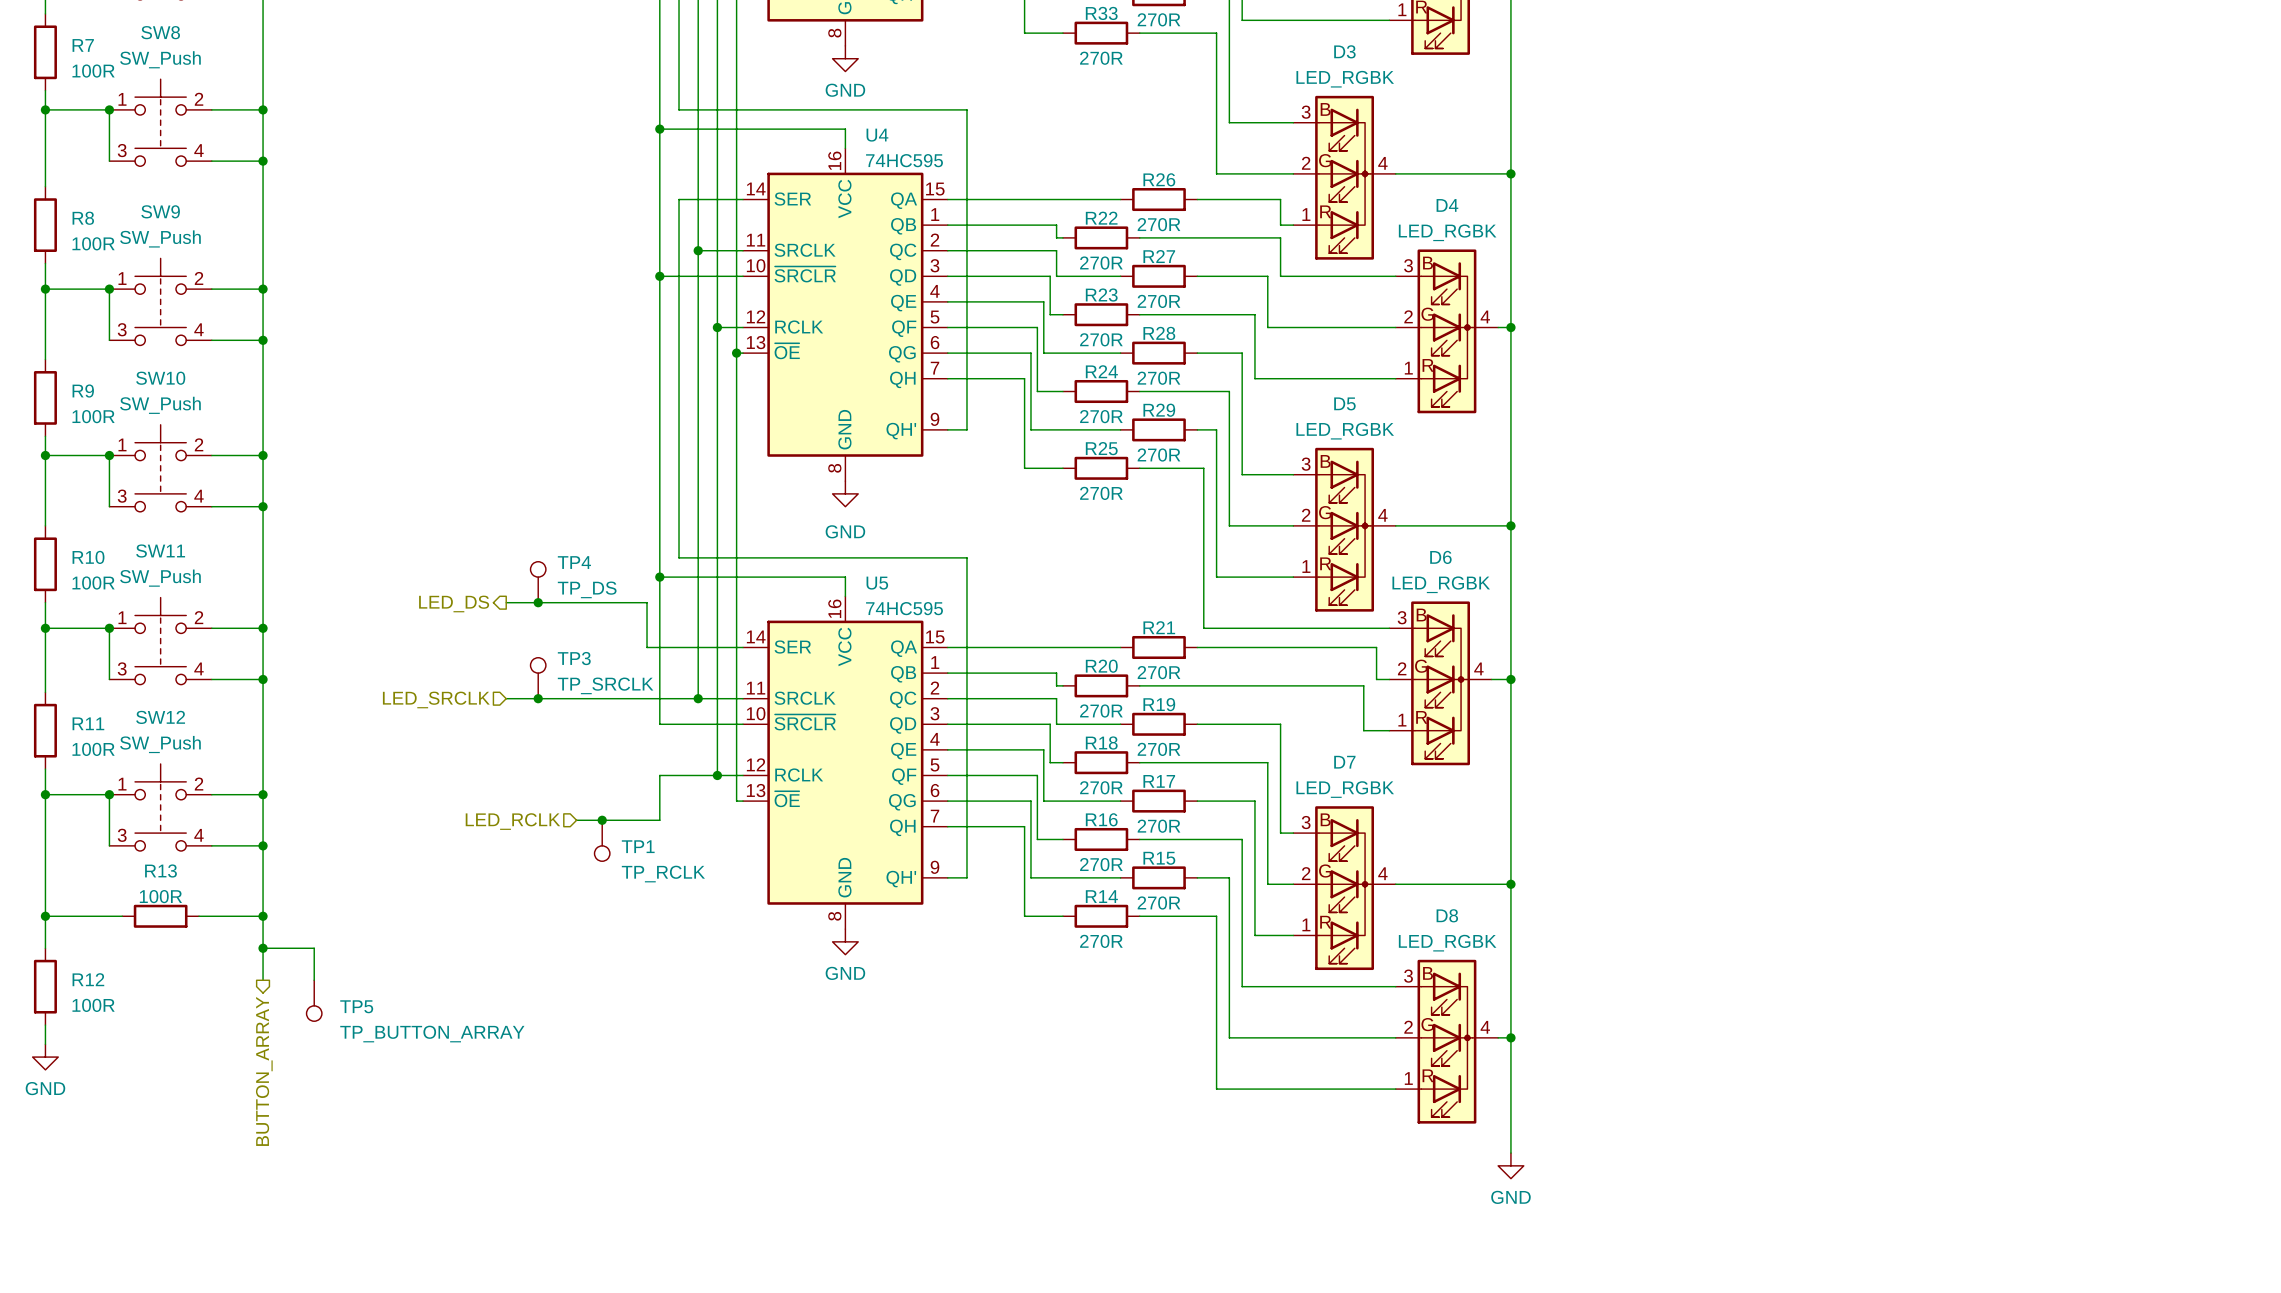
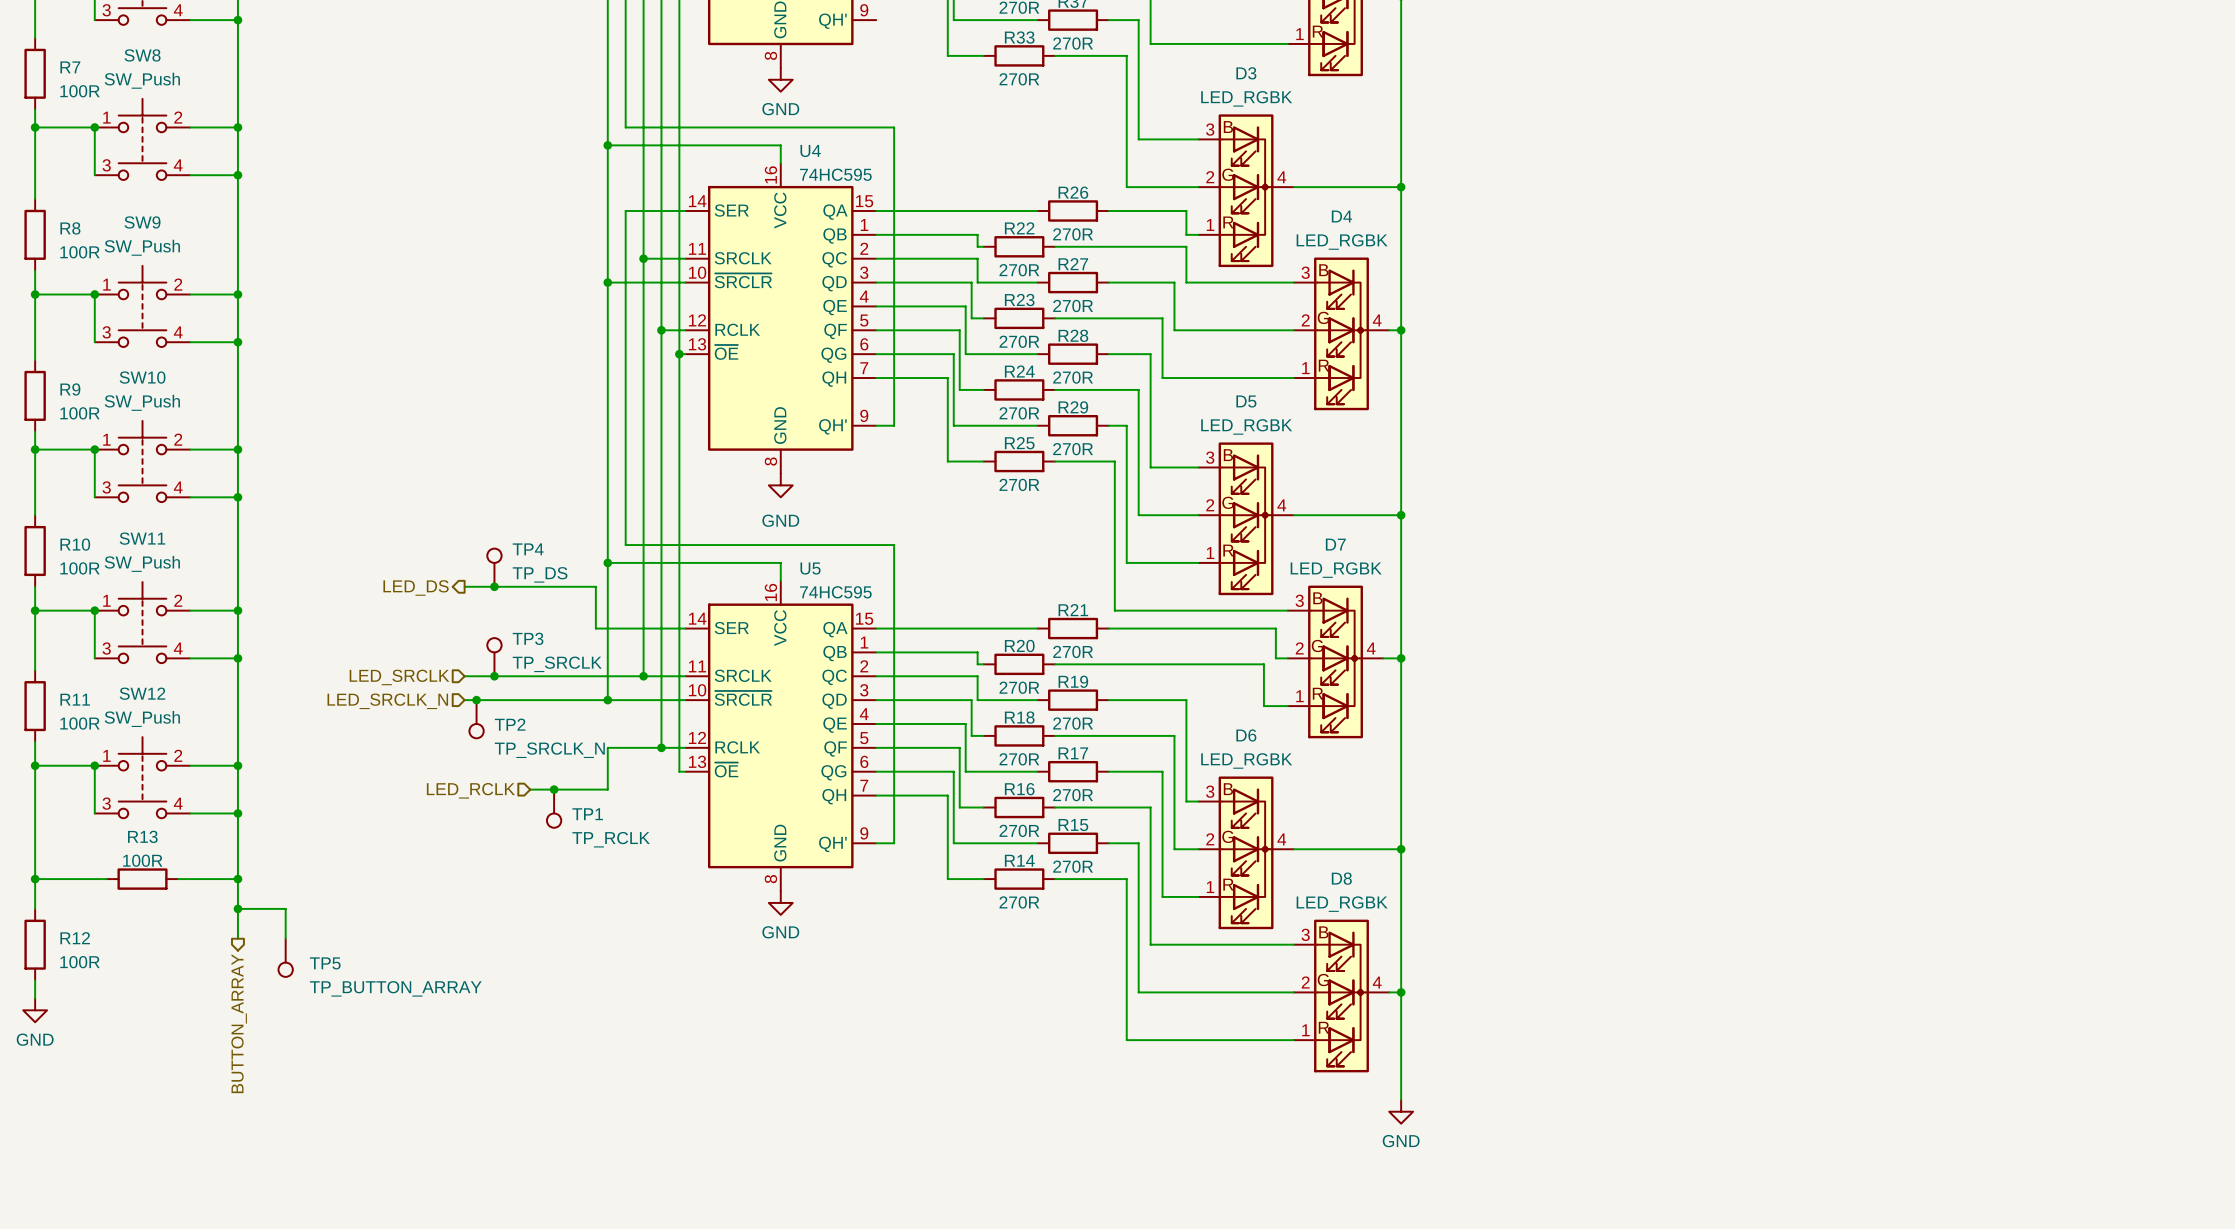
D6 name: D6 (1440, 557) -> D7 (1335, 544)
wire: none -> (464, 700) (607, 700)
junction: none -> (476, 700)
junction: none -> (607, 700)
hierarchical label: none -> LED_SRCLK_N (387, 701)
TP2: none -> TP_SRCLK_N (476, 719)
D7 name: D7 (1344, 762) -> D6 (1246, 735)

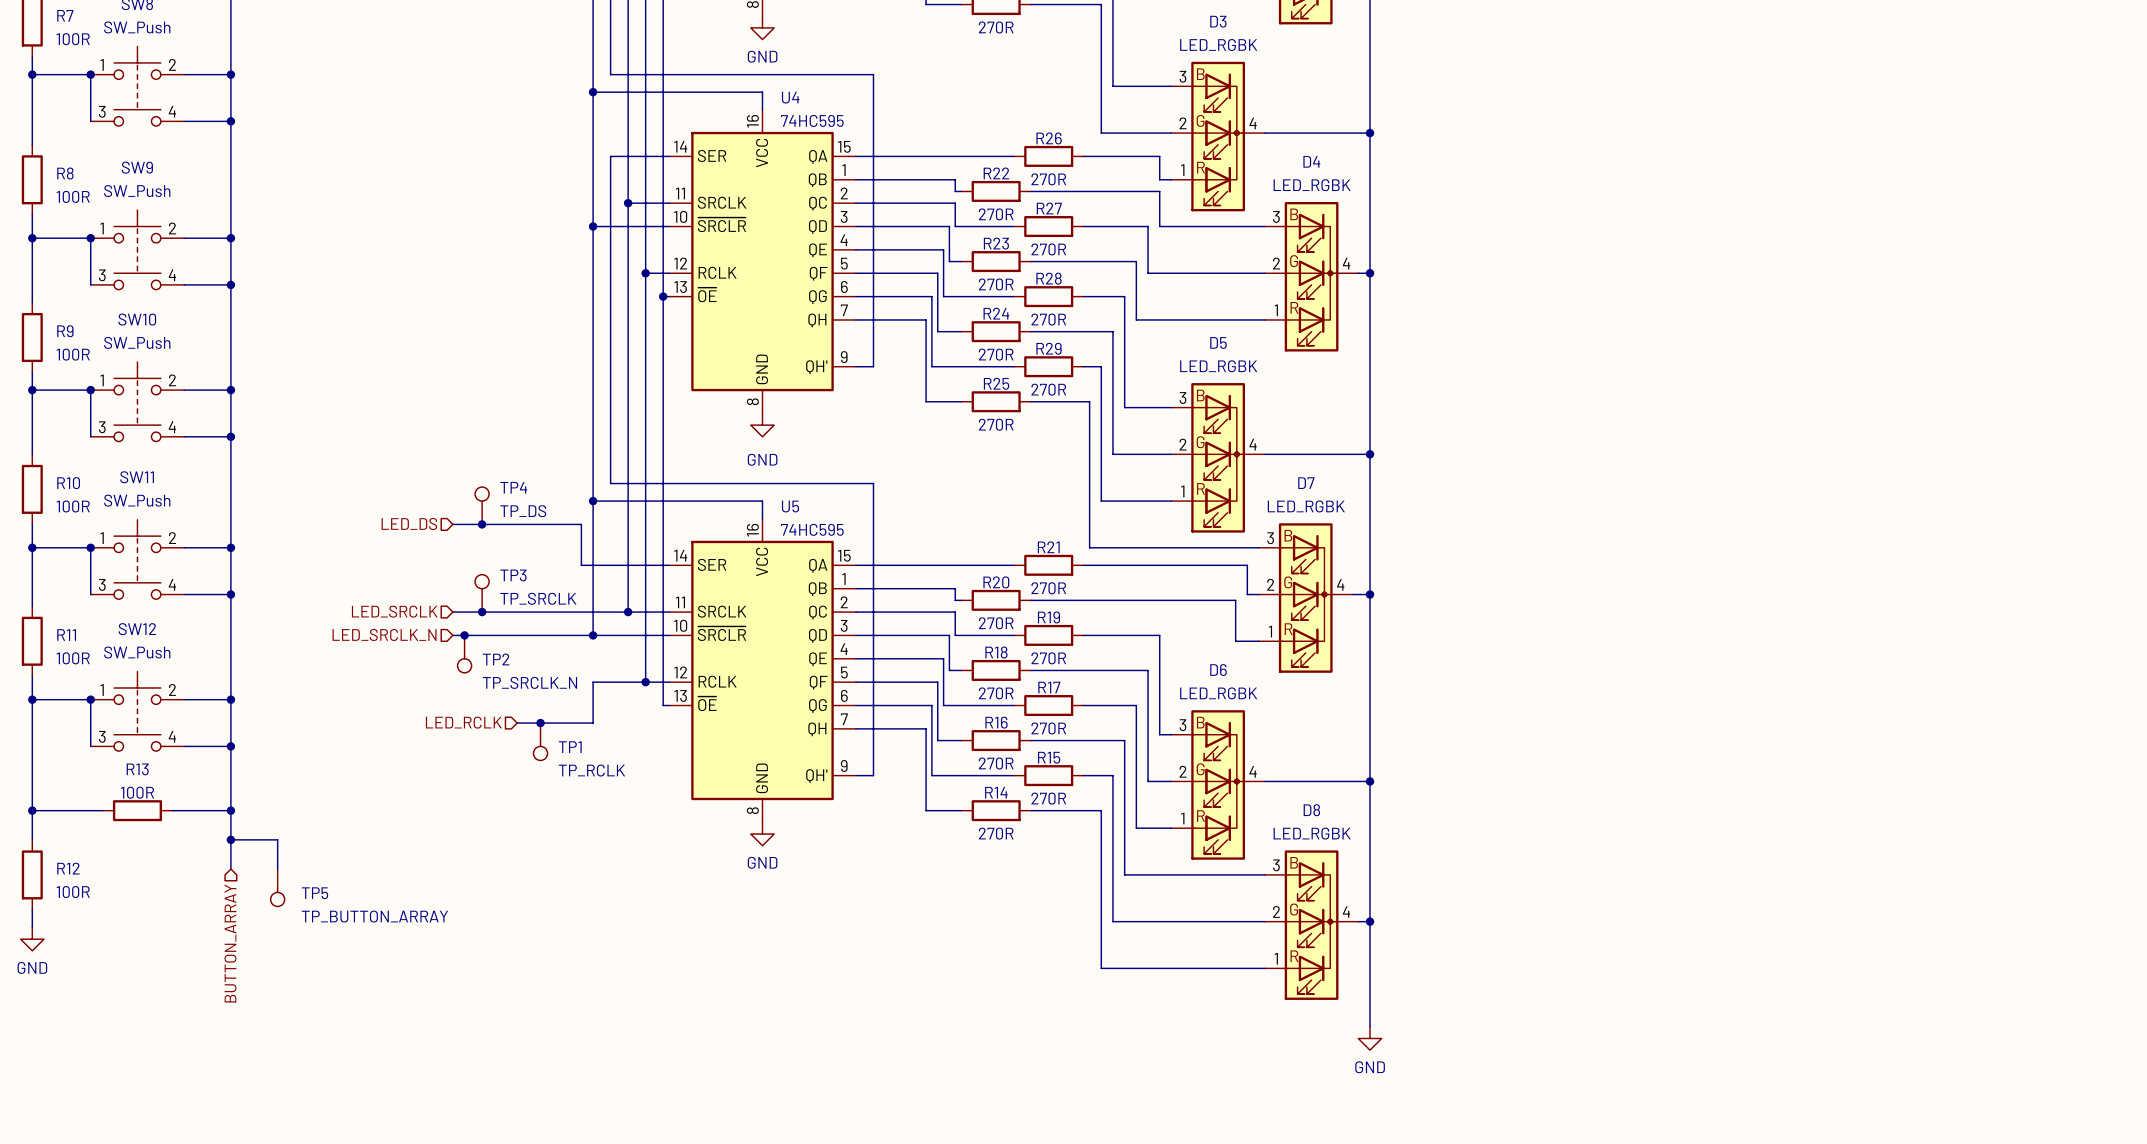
hierarchical label shape: output (416, 587) -> input (409, 524)
hierarchical label shape: output (239, 1023) -> input (230, 943)

